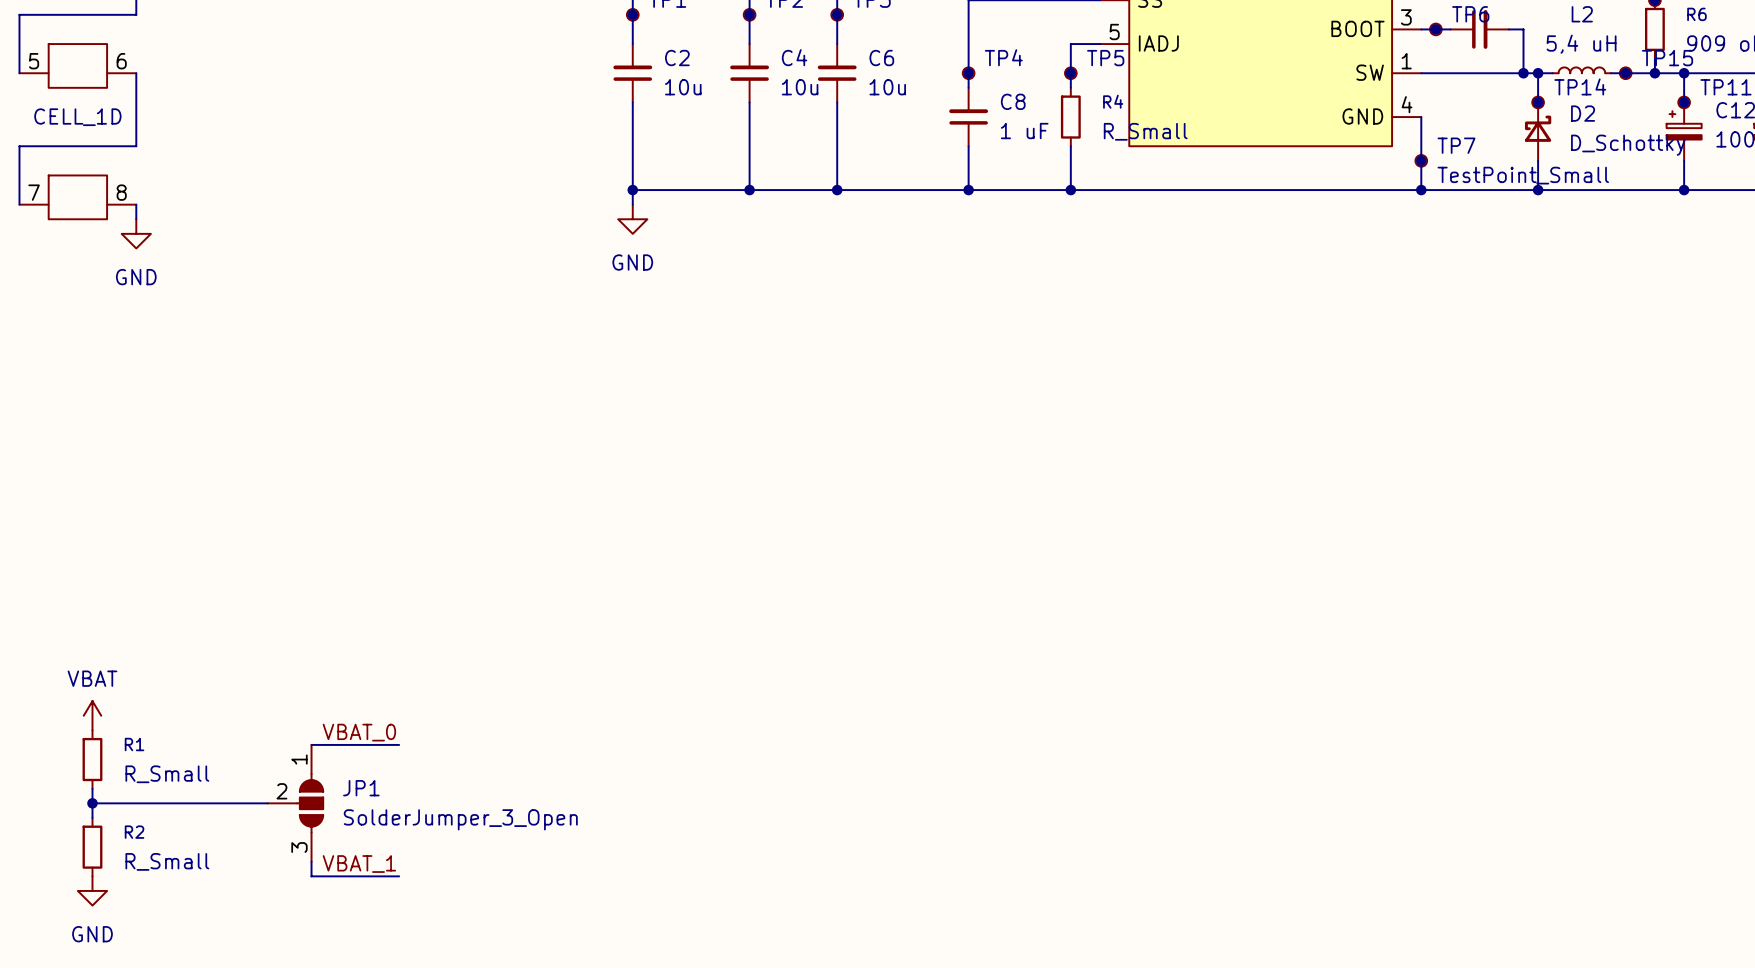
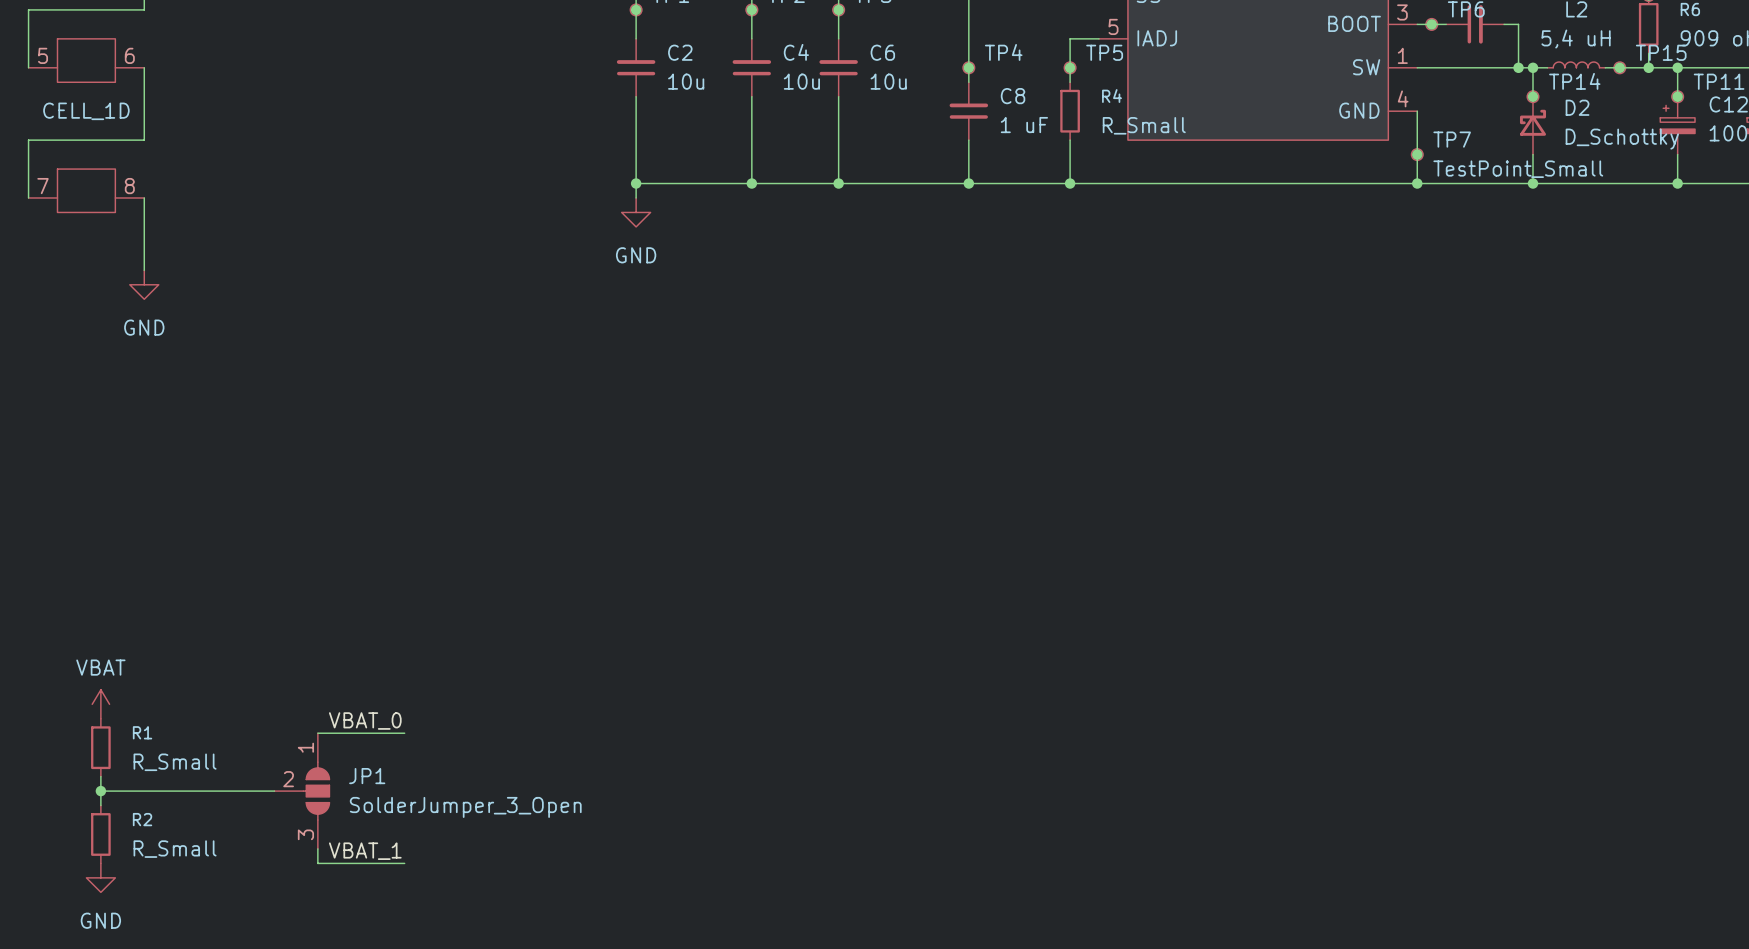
wire: none -> (144, 212) (144, 270)
power symbol position: GND (136, 233) -> GND (144, 284)

